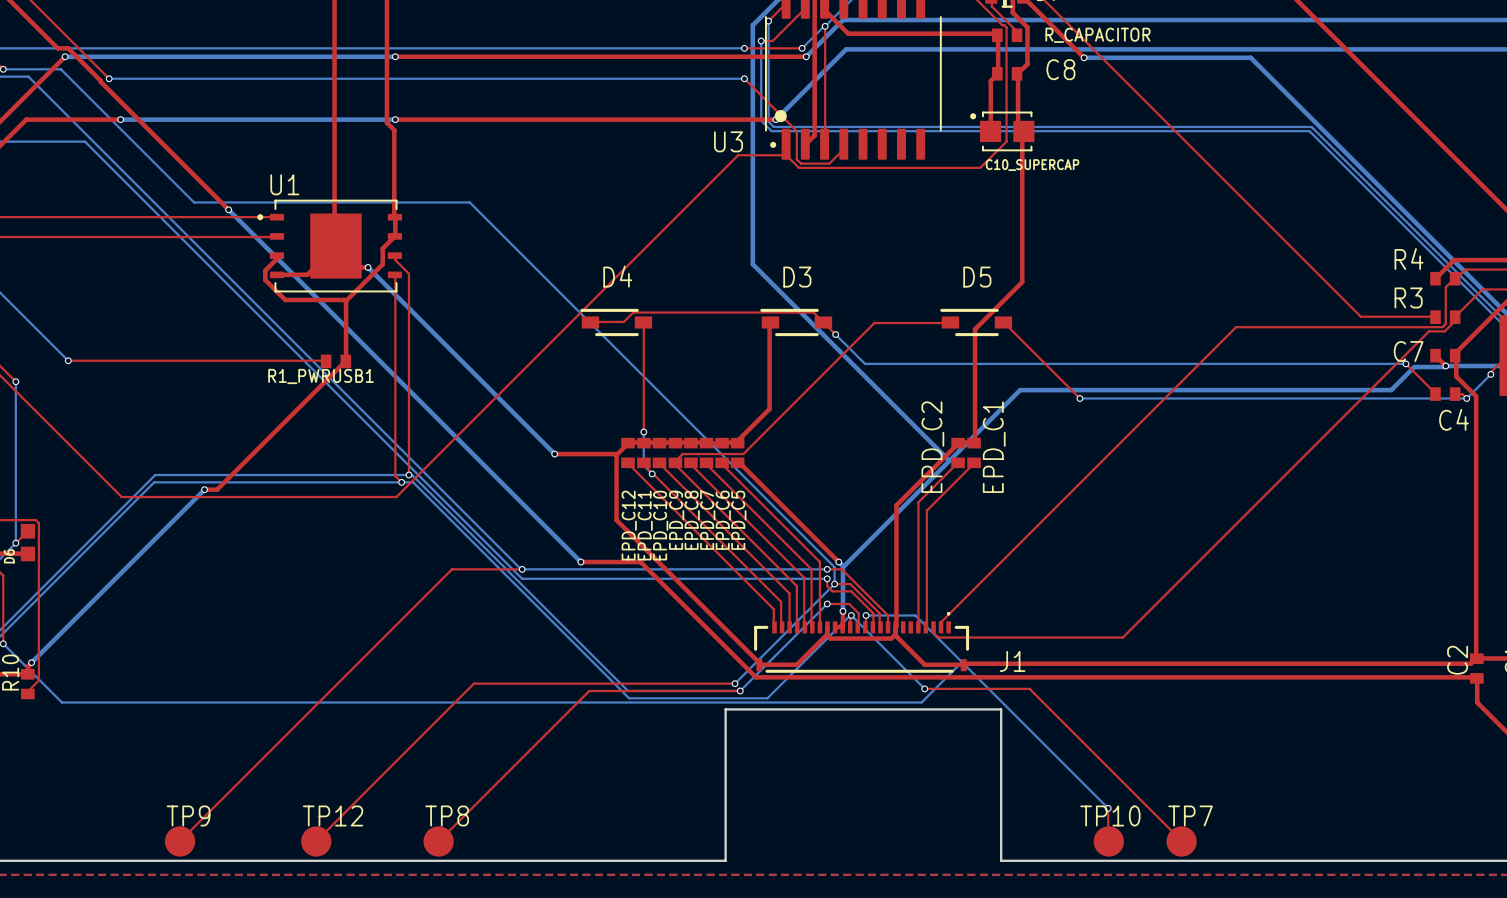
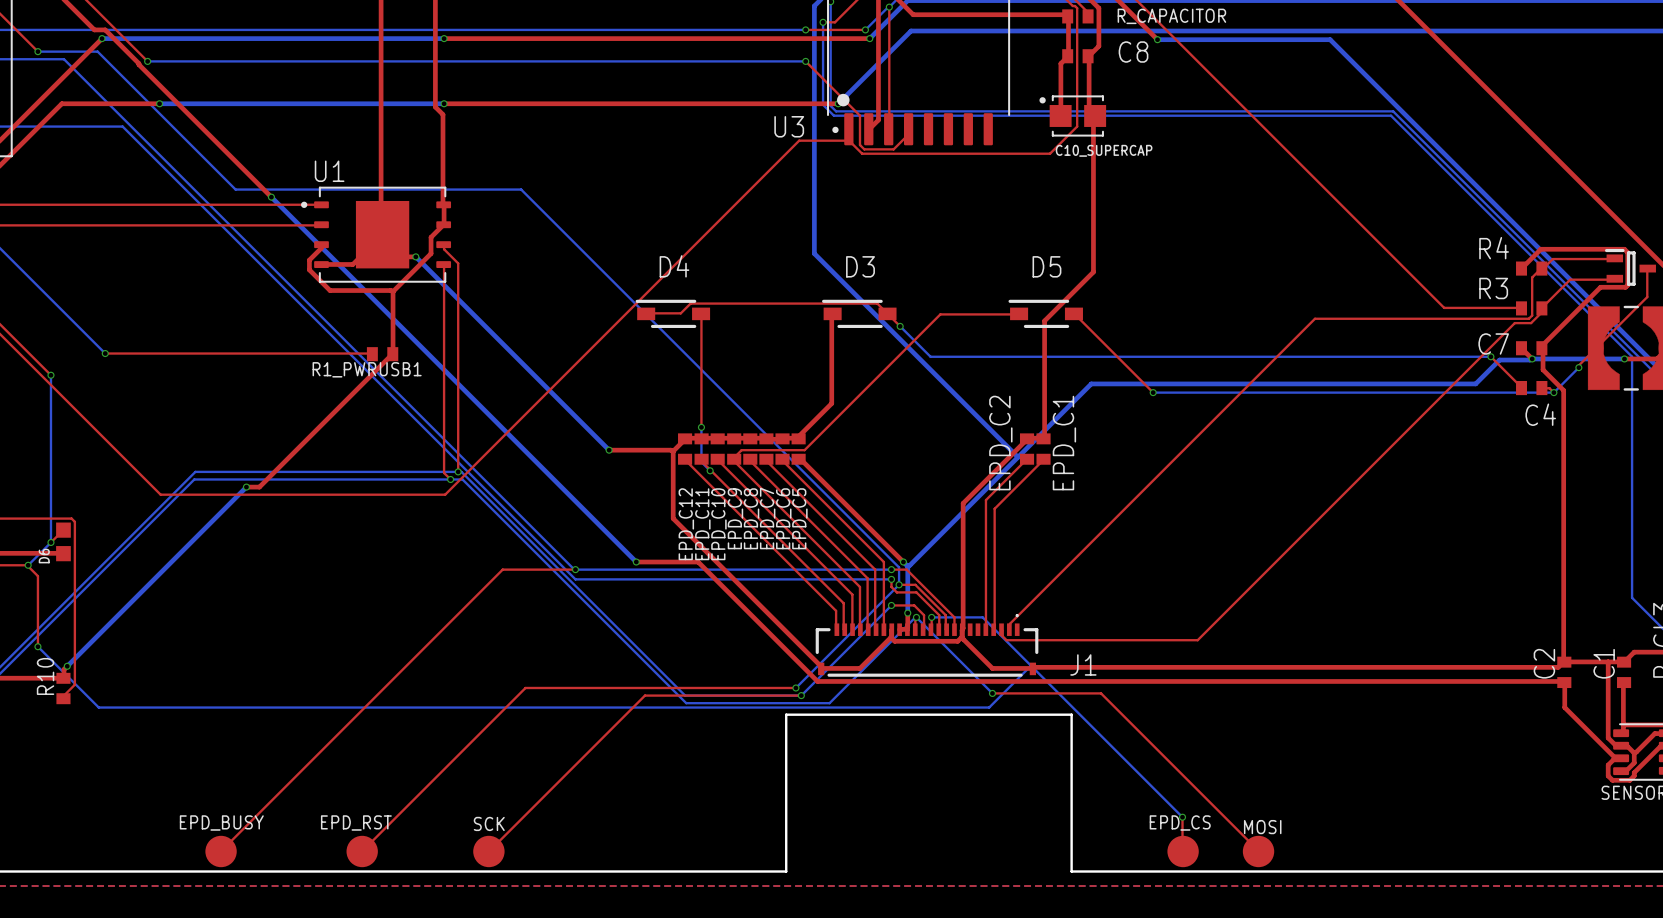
TP9 name: TP9 (188, 815) -> EPD_BUSY (221, 822)
TP12 name: TP12 (333, 815) -> EPD_RST (356, 822)
TP8 name: TP8 (447, 815) -> SCK (489, 823)
TP10 name: TP10 (1110, 815) -> EPD_CS (1180, 822)
TP7 name: TP7 (1190, 815) -> MOSI (1262, 827)

